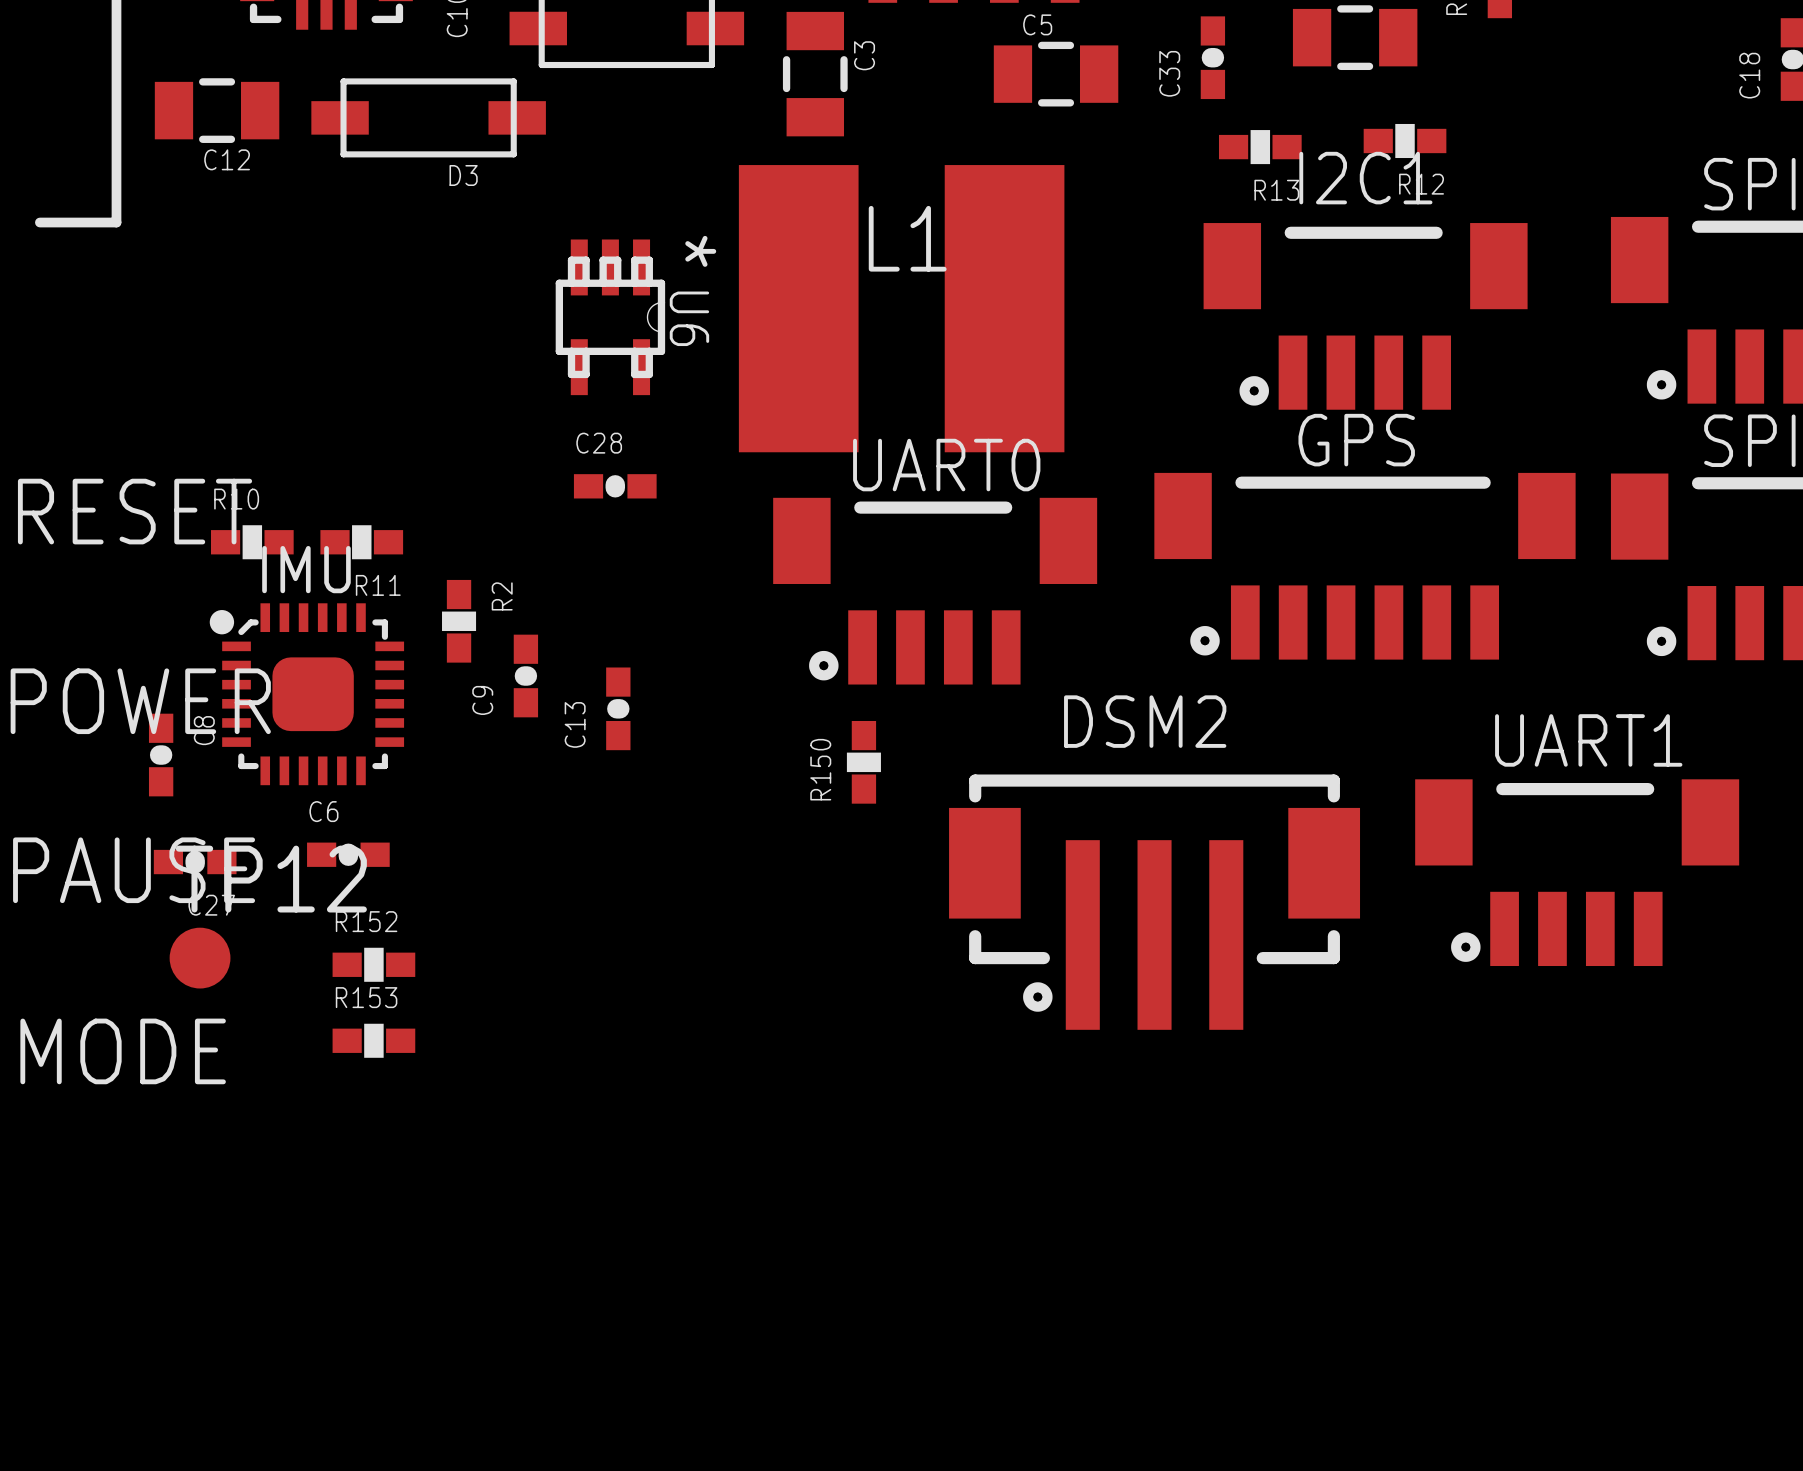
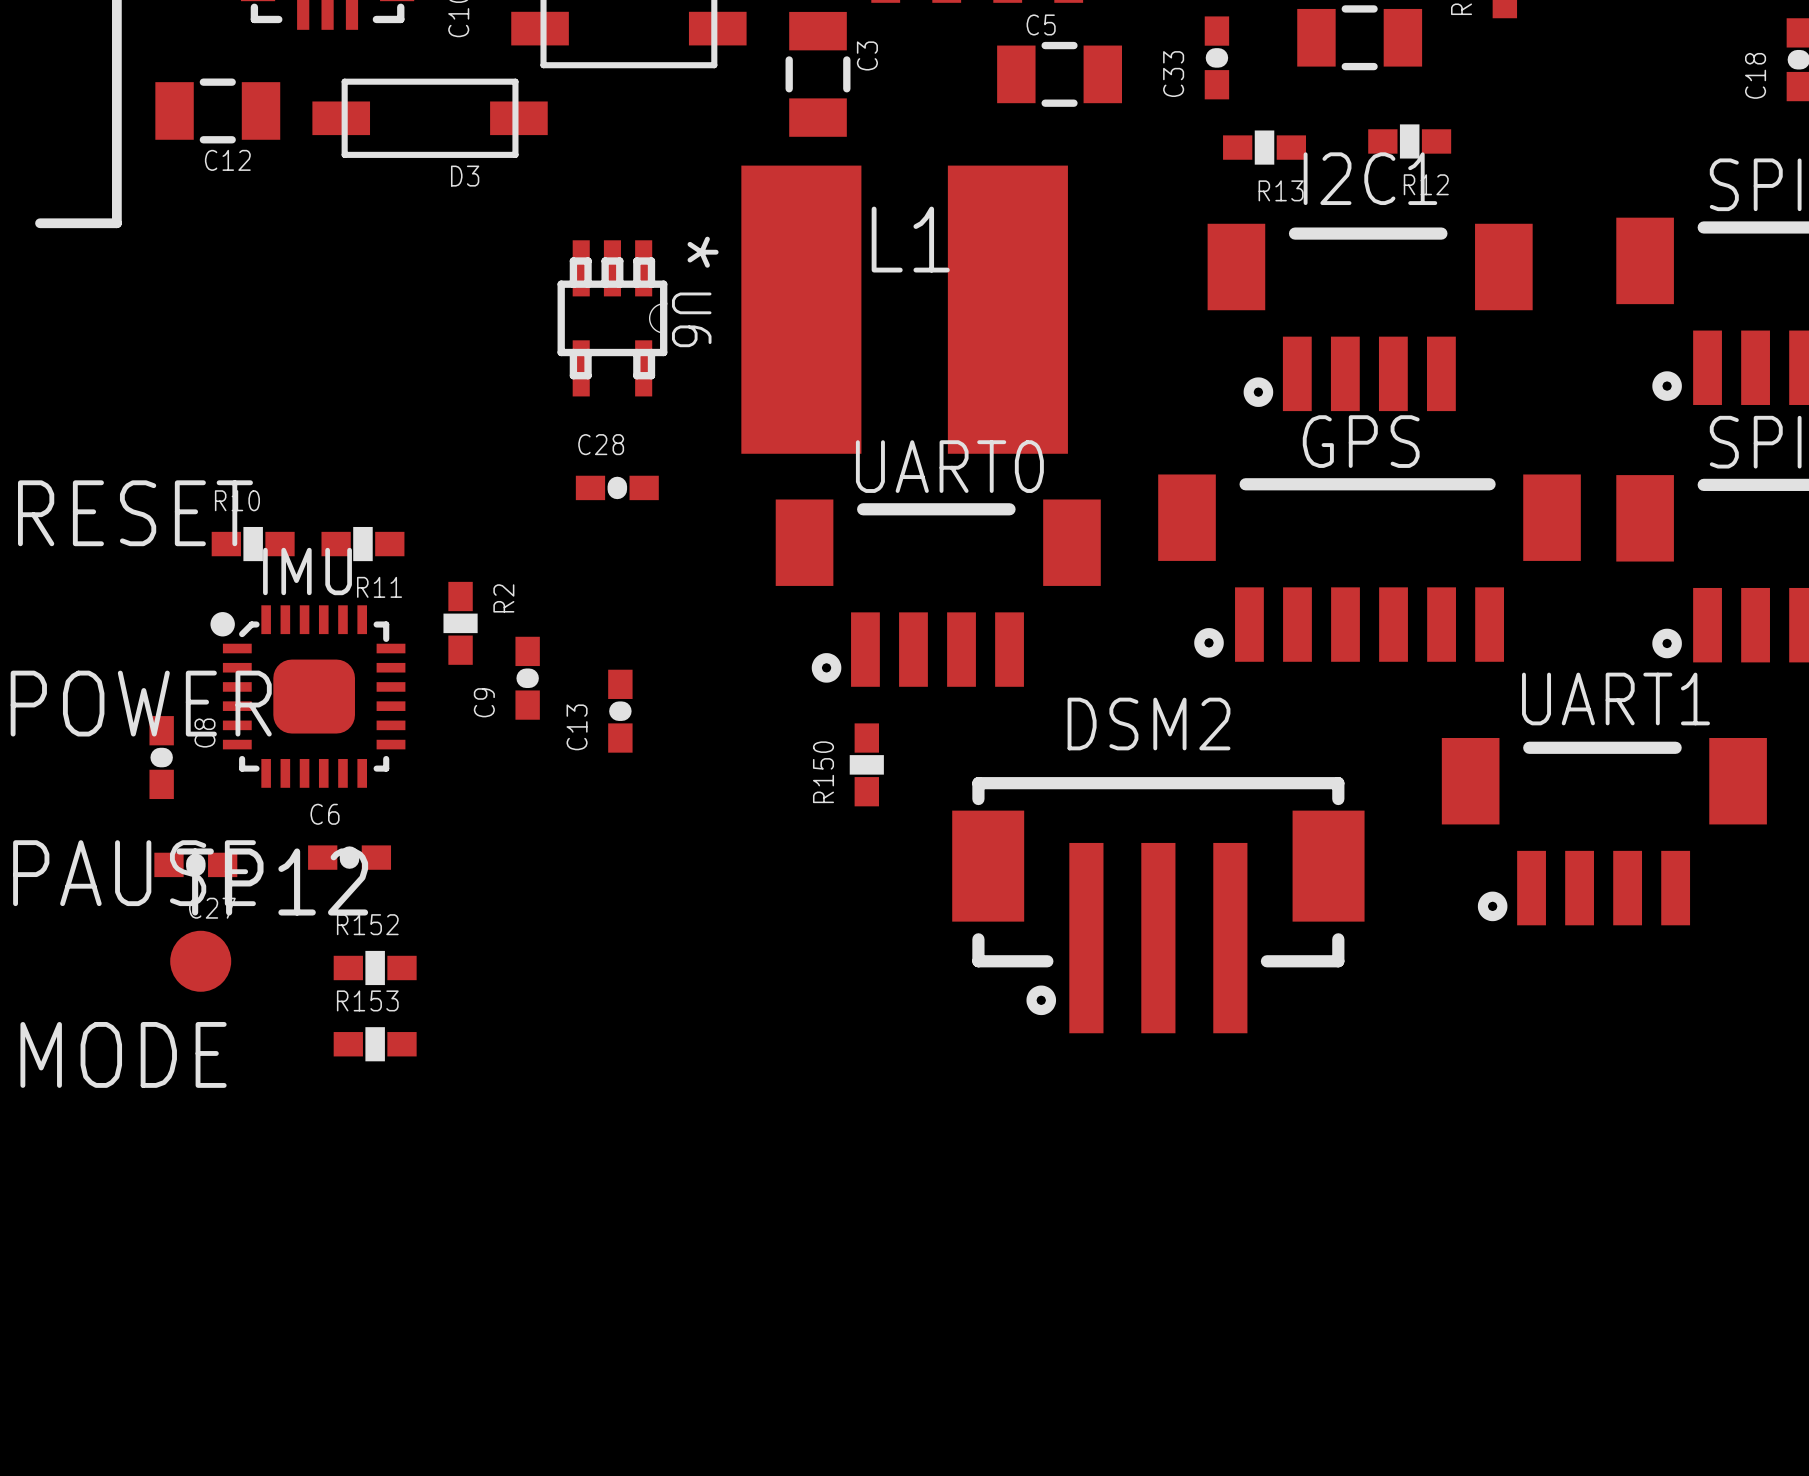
UART1 position: (1577, 872) -> (1604, 831)

